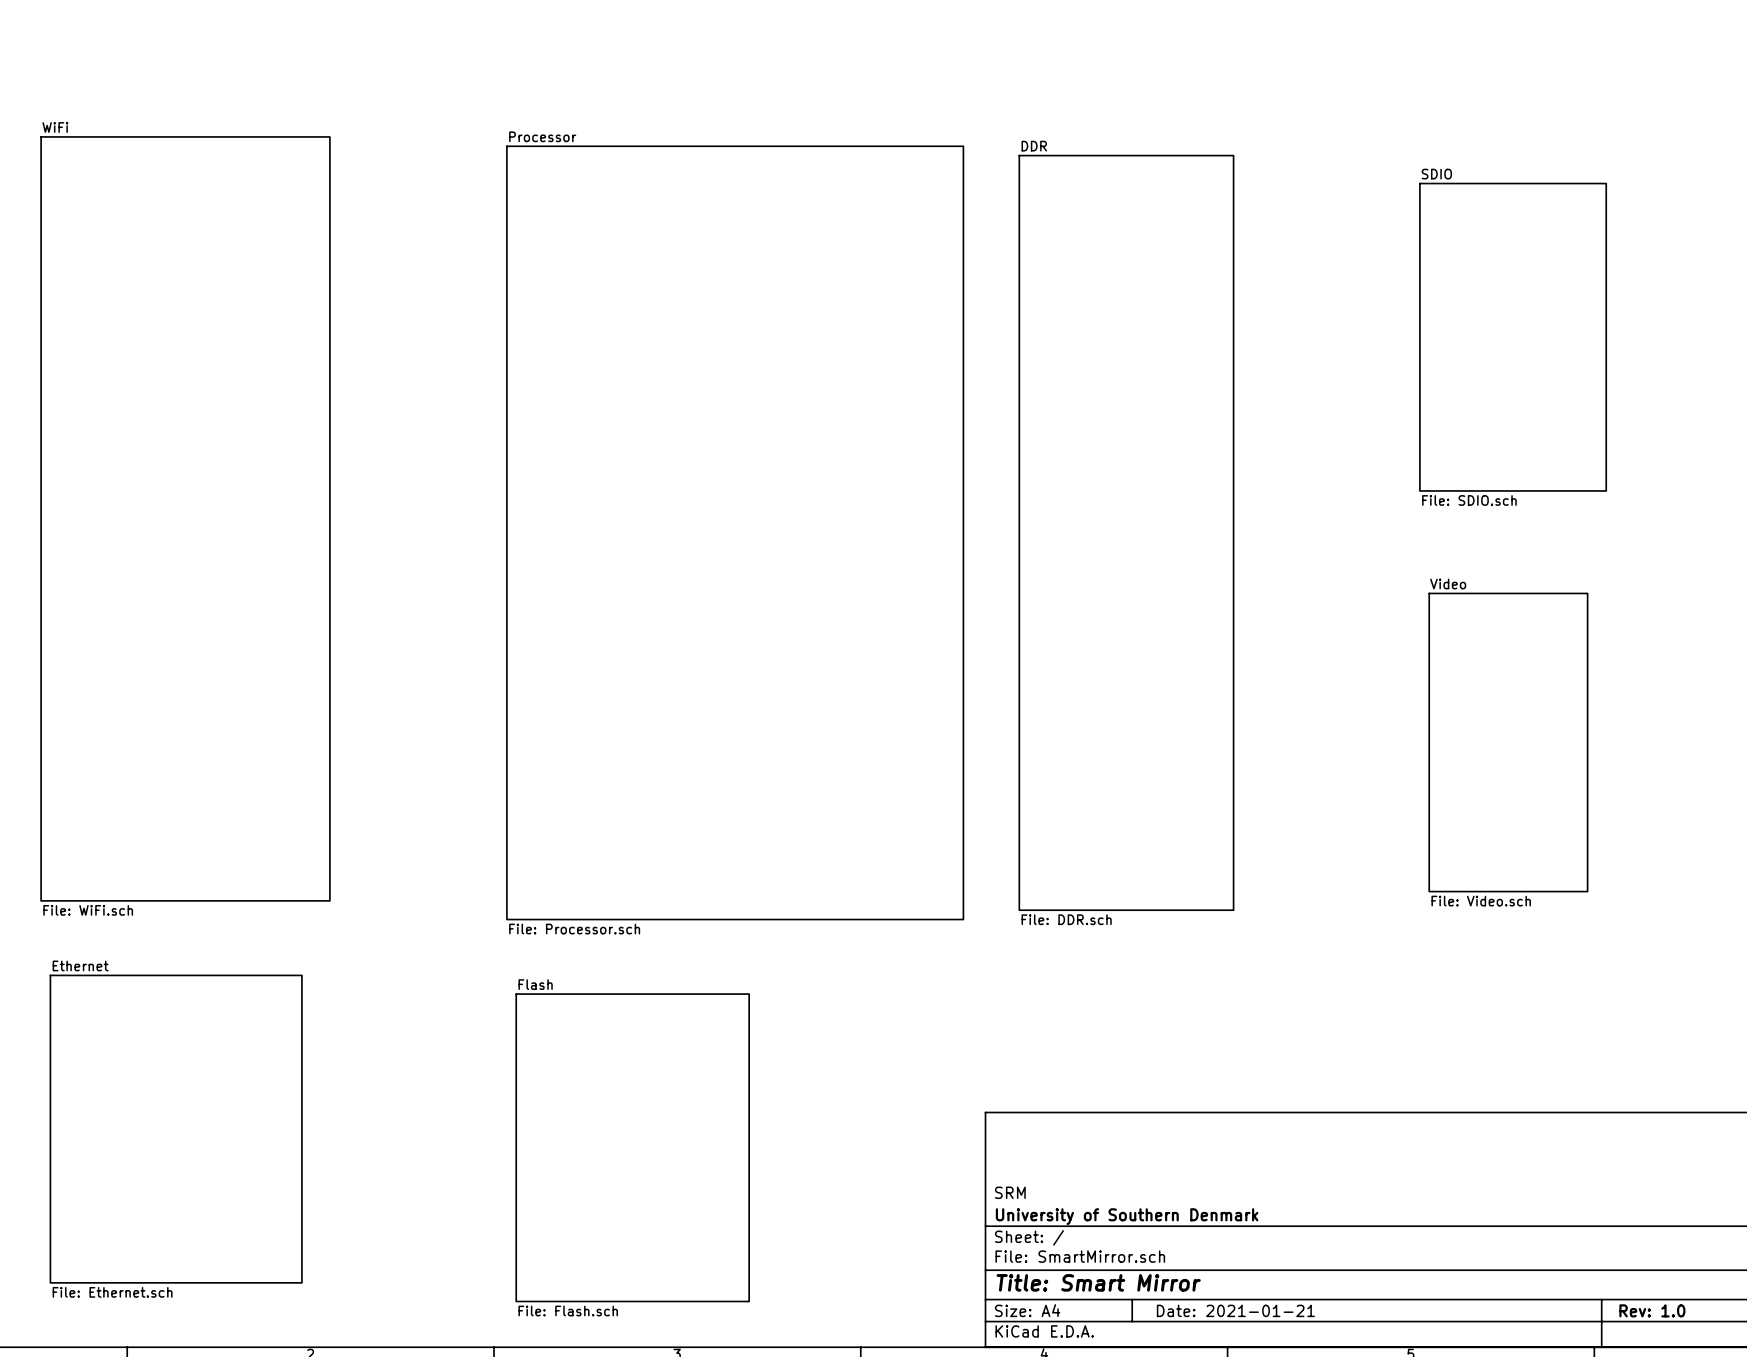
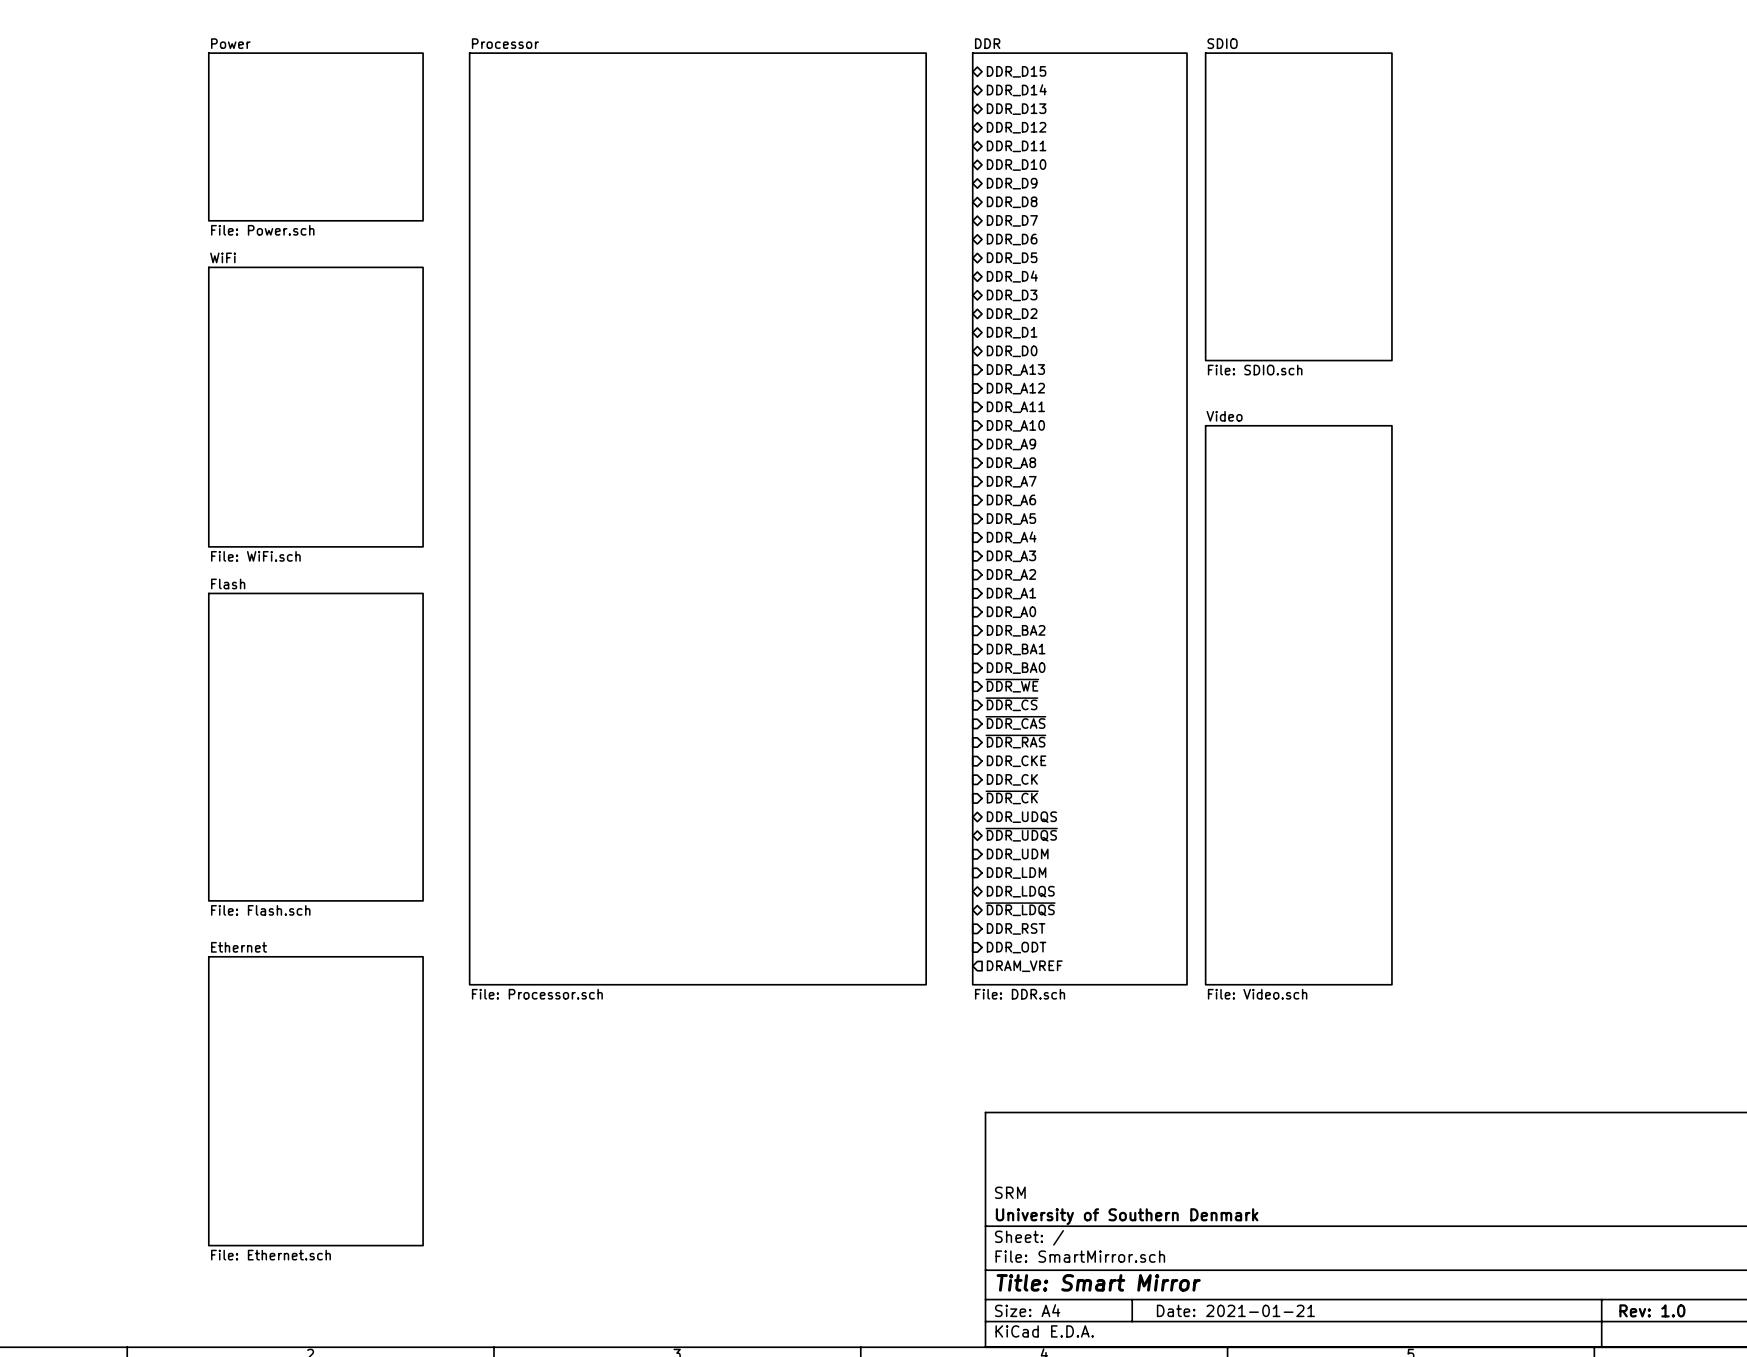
sheet pin: none -> DDR_D15 (1016, 71)
sheet pin: none -> DDR_D14 (1016, 90)
sheet pin: none -> DDR_D13 (1016, 109)
sheet pin: none -> DDR_D12 (1016, 127)
sheet Power: none -> File: Power.sch (315, 136)
sheet pin: none -> DDR_D11 (1016, 146)
sheet pin: none -> DDR_D10 (1016, 165)
sheet pin: none -> DDR_D9 (1012, 183)
sheet pin: none -> DDR_D8 (1012, 202)
sheet SDIO: none -> File: SDIO.sch (1298, 206)
sheet pin: none -> DDR_D7 (1012, 220)
sheet pin: none -> DDR_D6 (1012, 239)
sheet pin: none -> DDR_D5 (1012, 258)
sheet pin: none -> DDR_D4 (1012, 276)
sheet pin: none -> DDR_D3 (1012, 295)
sheet pin: none -> DDR_D2 (1012, 314)
sheet pin: none -> DDR_D1 (1012, 332)
sheet SDIO: File: SDIO.sch (1513, 337) -> none
sheet pin: none -> DDR_D0 (1012, 351)
sheet pin: none -> DDR_A13 (1015, 369)
sheet pin: none -> DDR_A12 (1015, 388)
sheet WiFi: none -> File: WiFi.sch (315, 407)
sheet pin: none -> DDR_A11 (1015, 407)
sheet pin: none -> DDR_A10 (1015, 425)
sheet pin: none -> DDR_A9 (1011, 444)
sheet pin: none -> DDR_A8 (1011, 463)
sheet pin: none -> DDR_A7 (1011, 481)
sheet pin: none -> DDR_A6 (1011, 500)
sheet WiFi: File: WiFi.sch (185, 518) -> none
sheet Processor: none -> File: Processor.sch (697, 518)
sheet DDR: none -> File: DDR.sch (1079, 518)
sheet pin: none -> DDR_A5 (1011, 519)
sheet Processor: File: Processor.sch (735, 532) -> none
sheet DDR: File: DDR.sch (1126, 532) -> none
sheet pin: none -> DDR_A4 (1011, 537)
sheet pin: none -> DDR_A3 (1011, 556)
sheet pin: none -> DDR_A2 (1011, 574)
sheet pin: none -> DDR_A1 (1011, 593)
sheet pin: none -> DDR_A0 (1011, 612)
sheet pin: none -> DDR_BA2 (1016, 630)
sheet pin: none -> DDR_BA1 (1016, 649)
sheet pin: none -> DDR_BA0 (1016, 668)
sheet pin: none -> ~{DDR_WE} (1012, 685)
sheet pin: none -> ~{DDR_CS} (1011, 704)
sheet Video: none -> File: Video.sch (1298, 705)
sheet pin: none -> ~{DDR_CAS} (1015, 722)
sheet pin: none -> ~{DDR_RAS} (1015, 741)
sheet Video: File: Video.sch (1508, 742) -> none
sheet Flash: none -> File: Flash.sch (315, 747)
sheet pin: none -> DDR_CKE (1016, 761)
sheet pin: none -> DDR_CK (1012, 779)
sheet pin: none -> ~{DDR_CK} (1012, 797)
sheet pin: none -> DDR_UDQS (1021, 817)
sheet pin: none -> ~{DDR_UDQS} (1021, 834)
sheet pin: none -> DDR_UDM (1017, 854)
sheet pin: none -> DDR_LDM (1016, 873)
sheet pin: none -> DDR_LDQS (1020, 891)
sheet pin: none -> ~{DDR_LDQS} (1020, 909)
sheet pin: none -> DDR_RST (1016, 928)
sheet pin: none -> DDR_ODT (1016, 947)
sheet pin: none -> DRAM_VREF (1024, 966)
sheet Ethernet: none -> File: Ethernet.sch (315, 1101)
sheet Ethernet: File: Ethernet.sch (176, 1129) -> none
sheet Flash: File: Flash.sch (632, 1147) -> none

